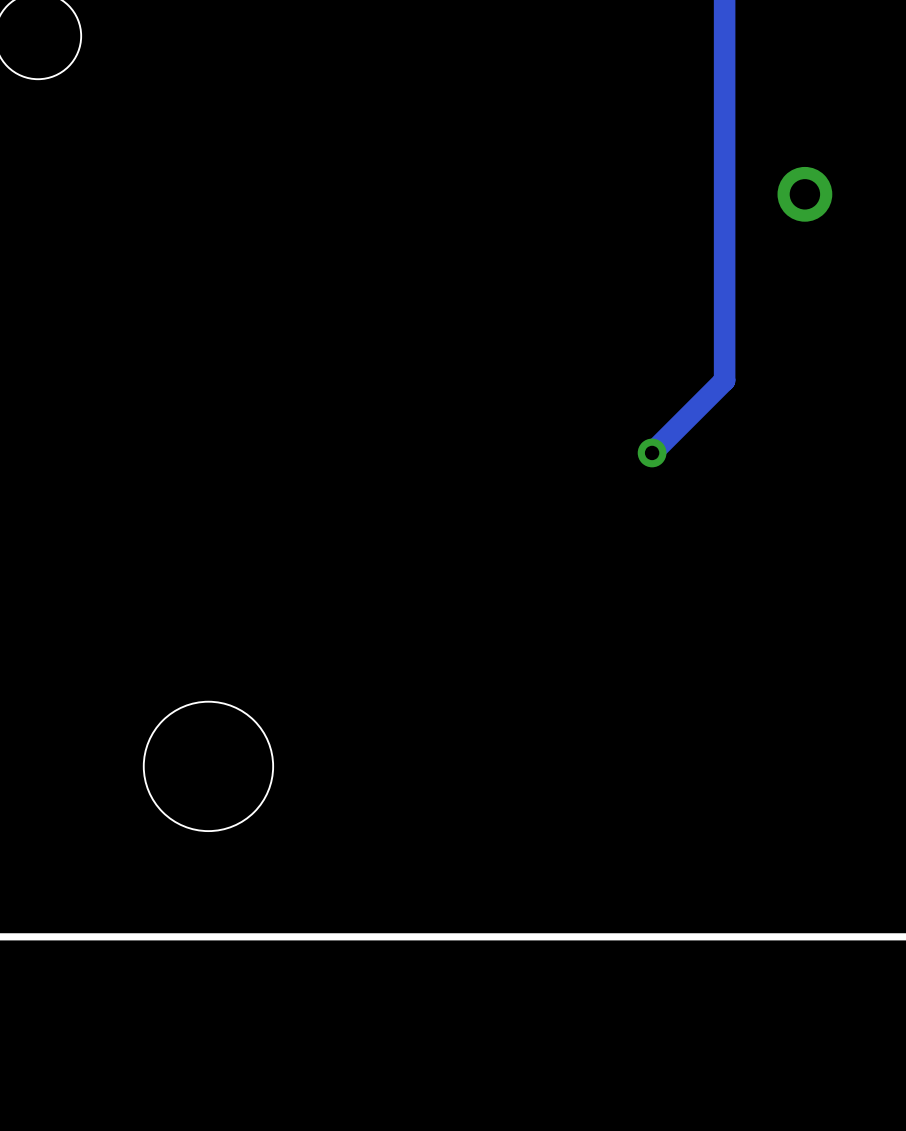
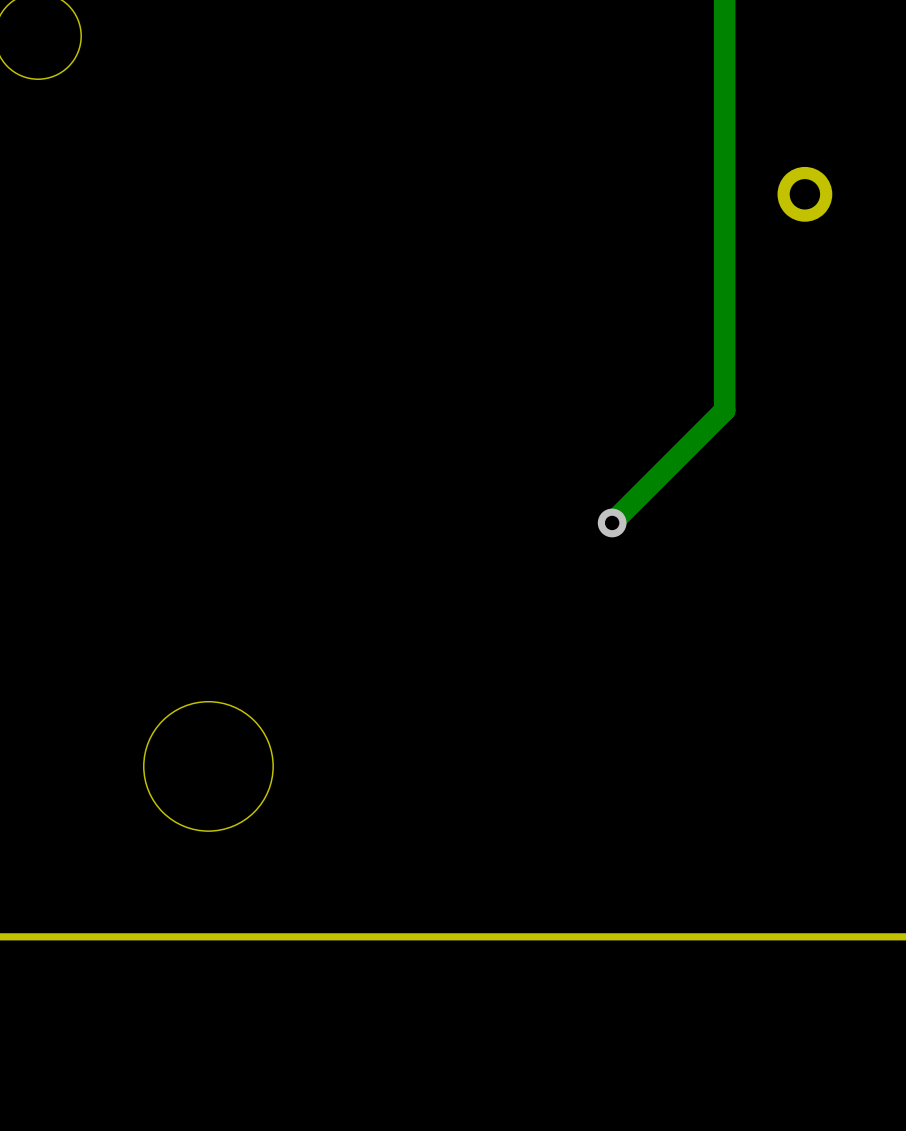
track: (724, 380) (652, 452) -> (724, 380) (724, 410) (612, 522)
via position: (652, 452) -> (612, 522)

